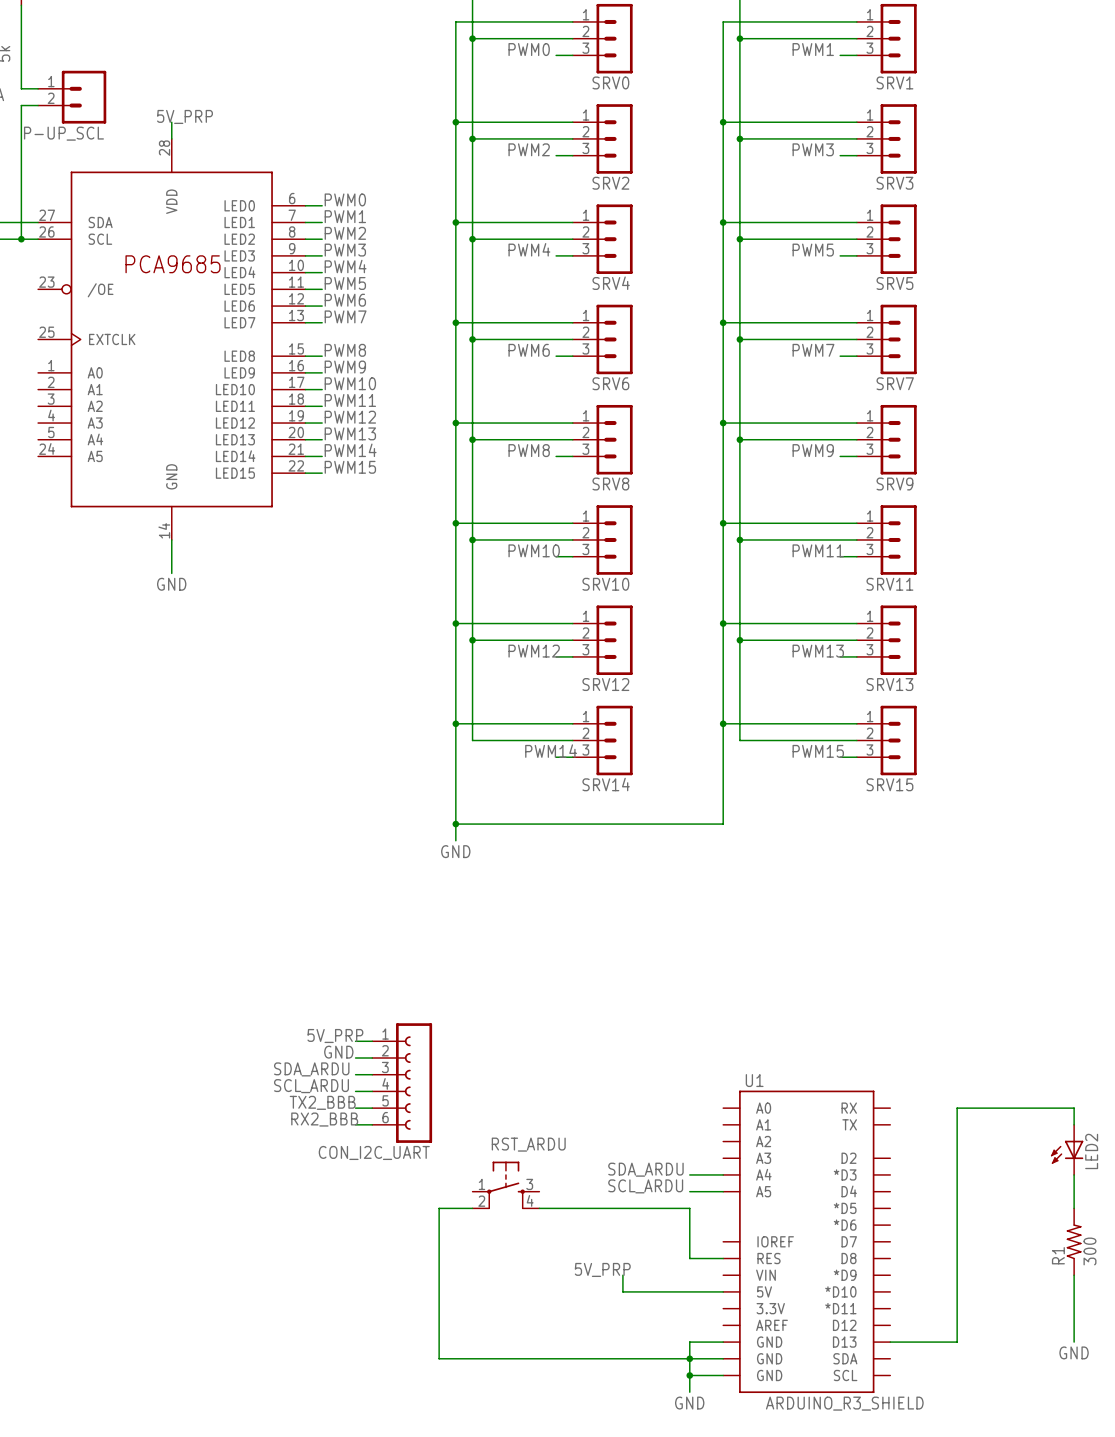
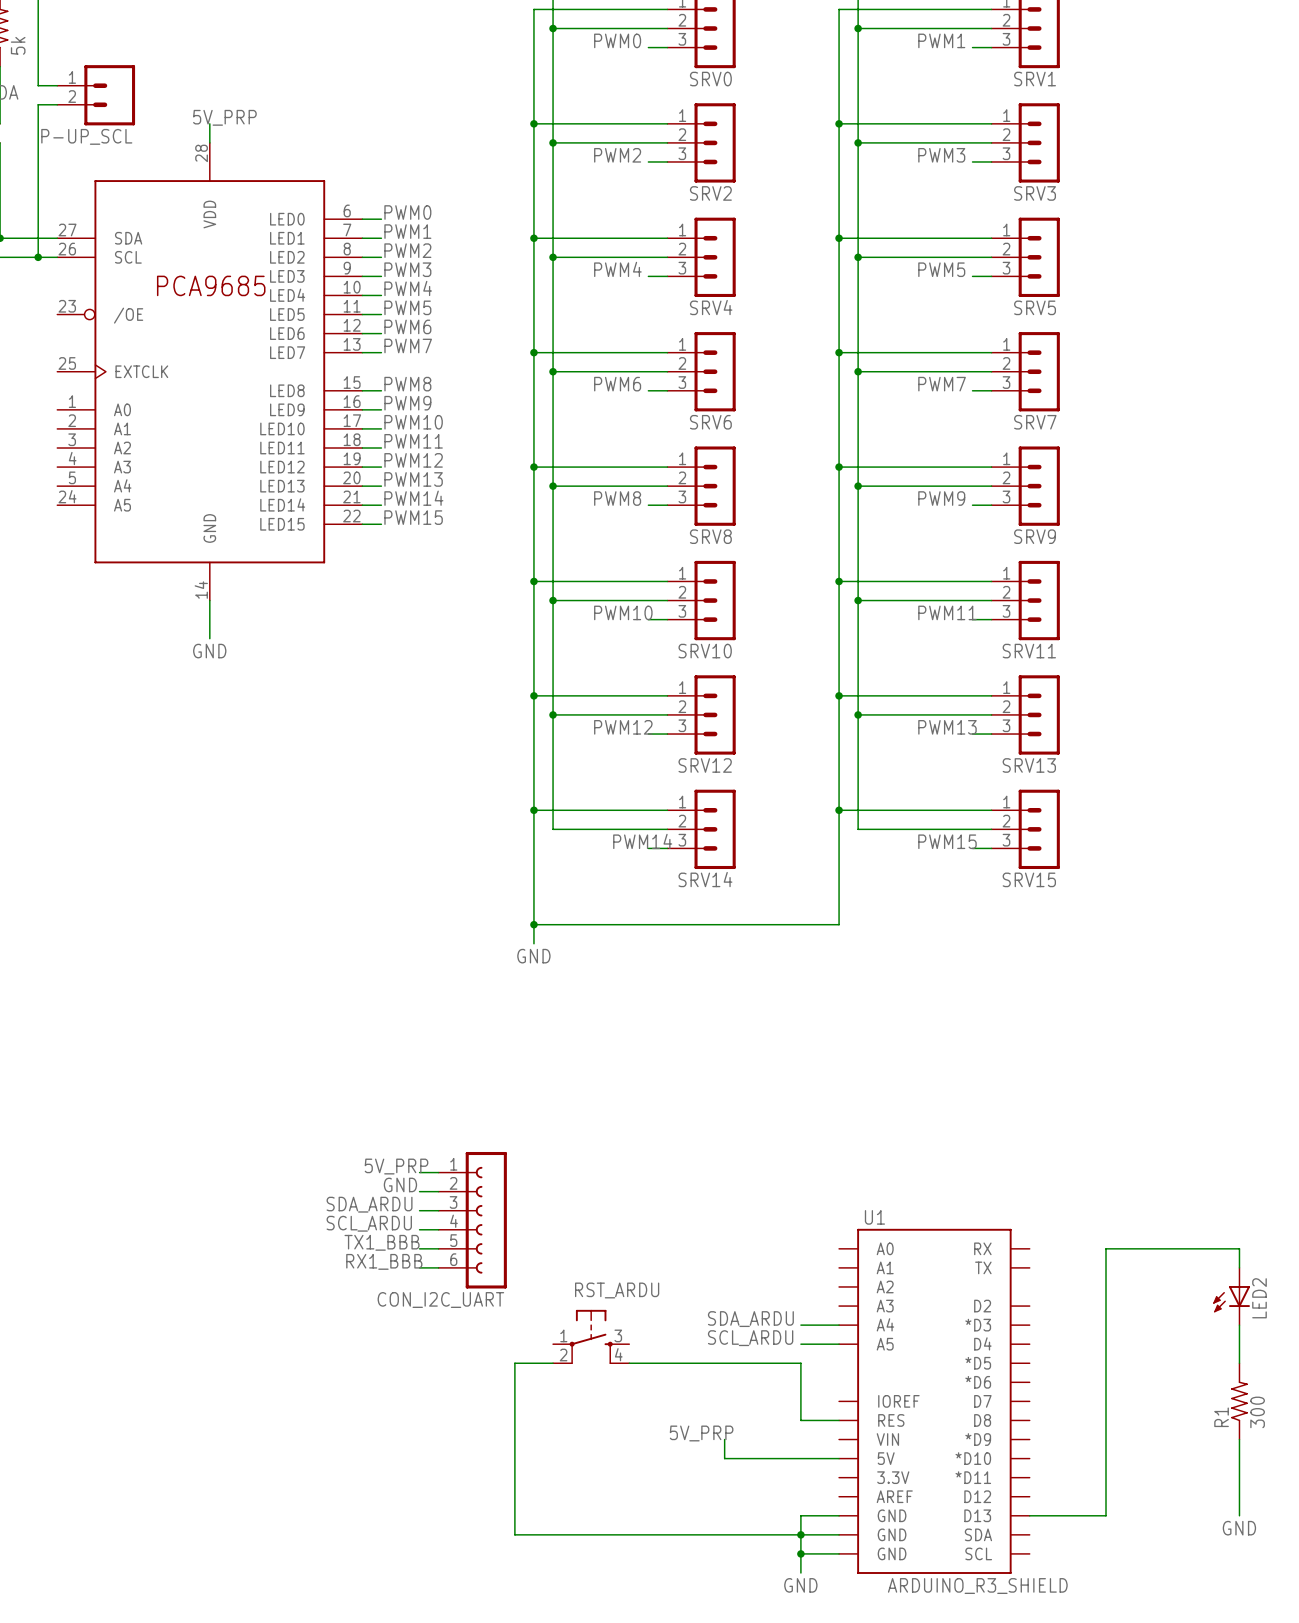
label: TX2_BBB (322, 1102) -> TX1_BBB (382, 1242)
label: RX2_BBB (324, 1119) -> RX1_BBB (384, 1261)

